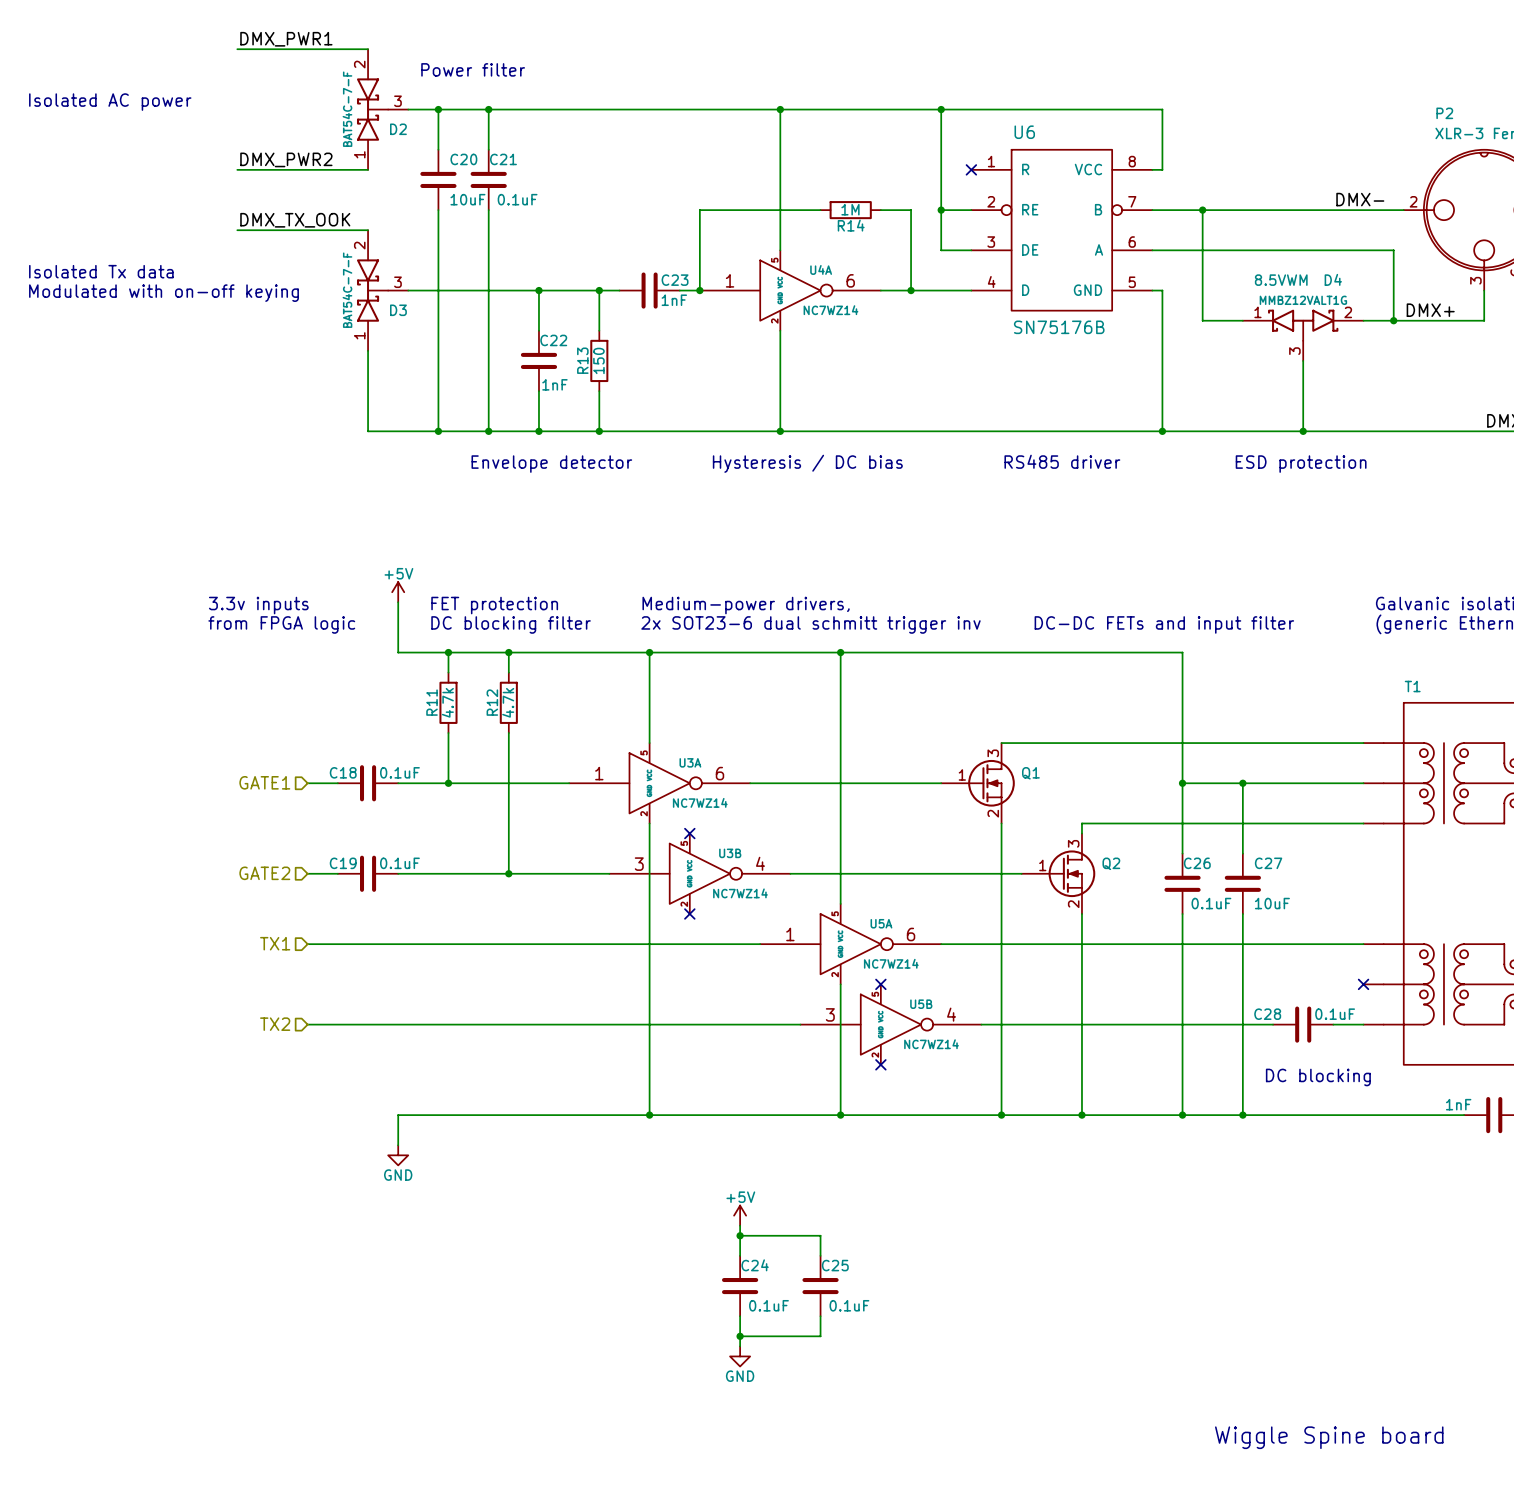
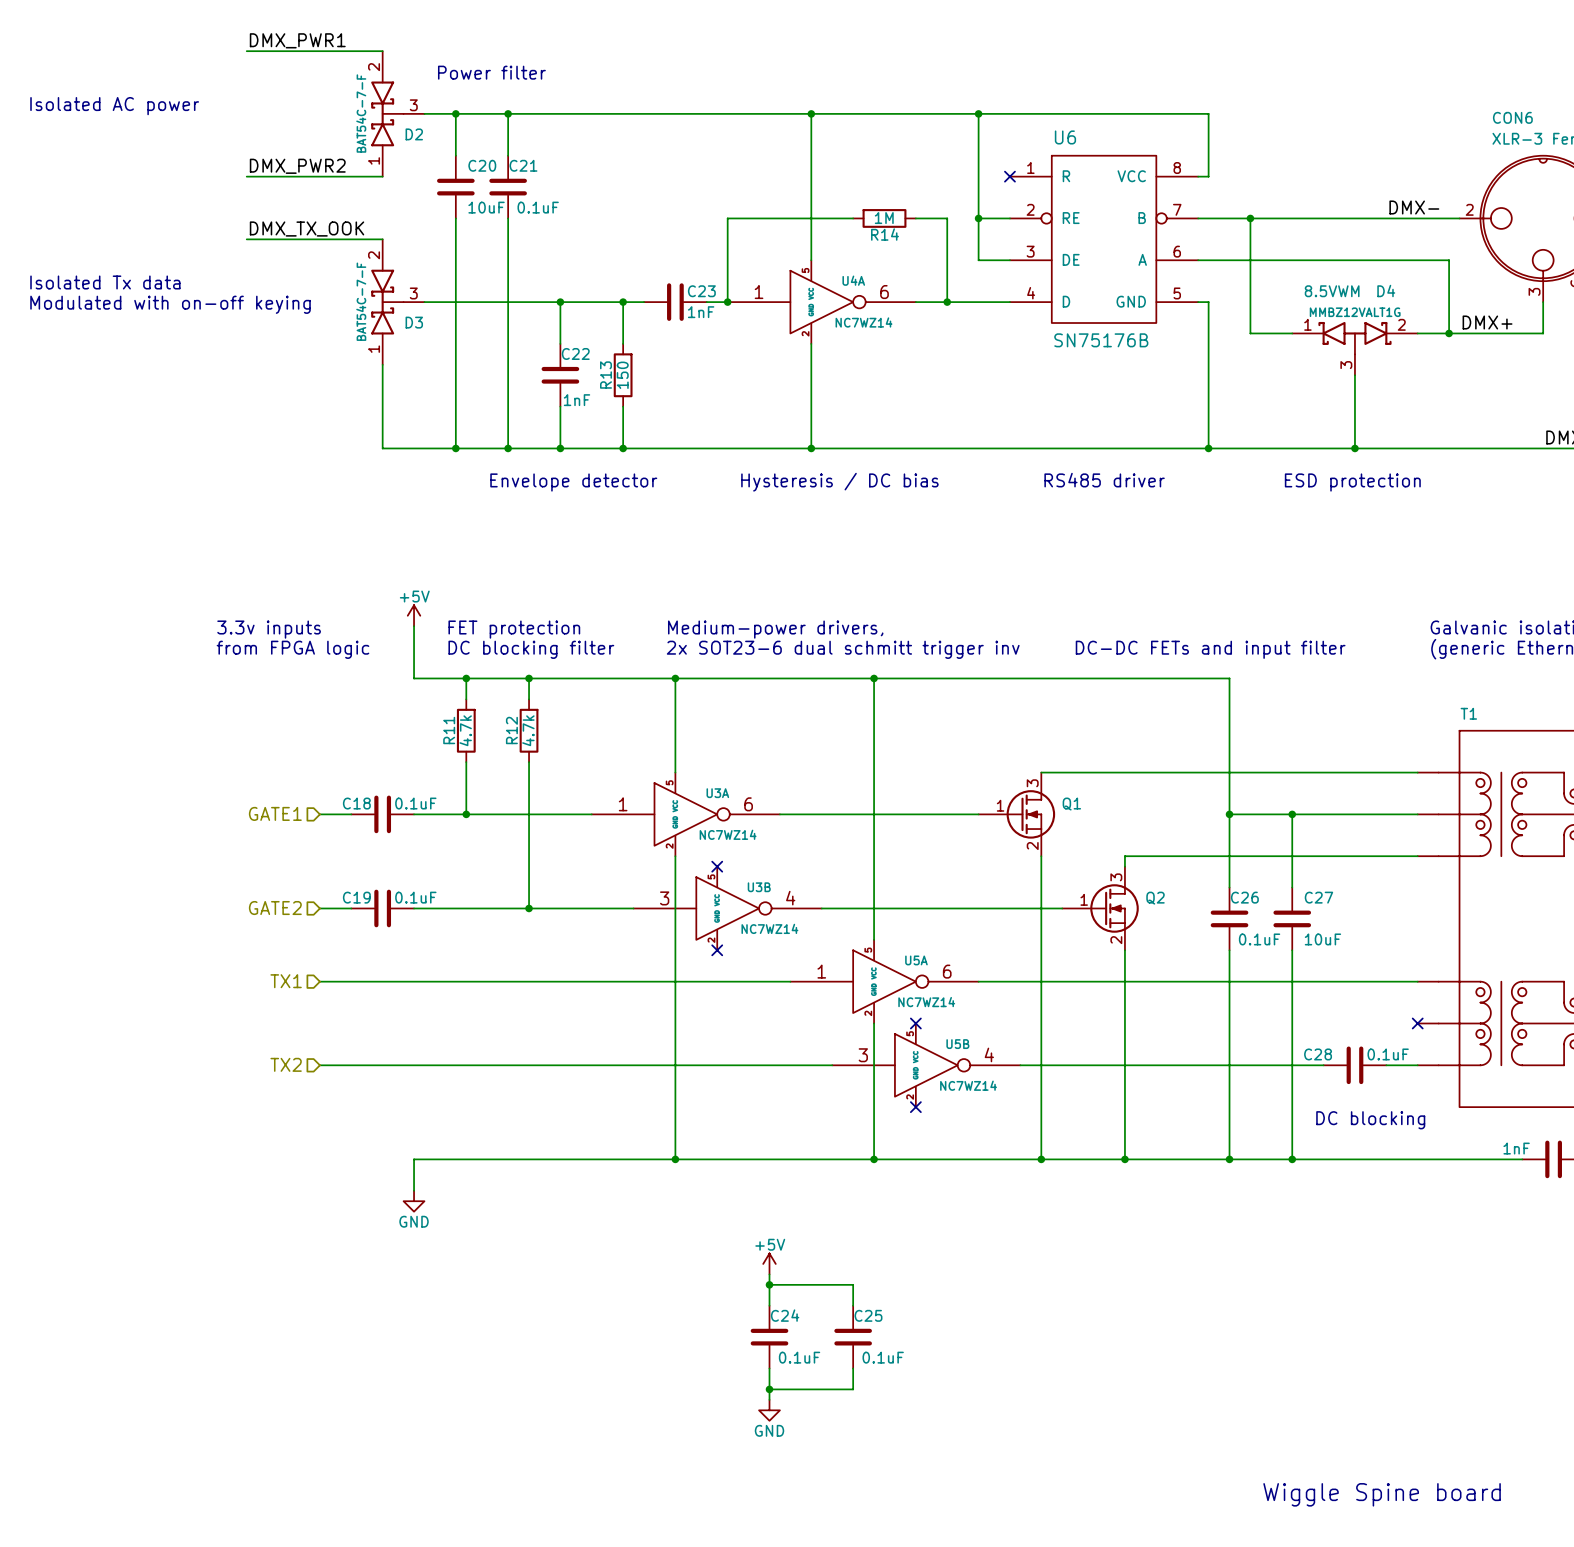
P2 name: P2 (1444, 113) -> CON6 (1512, 117)

